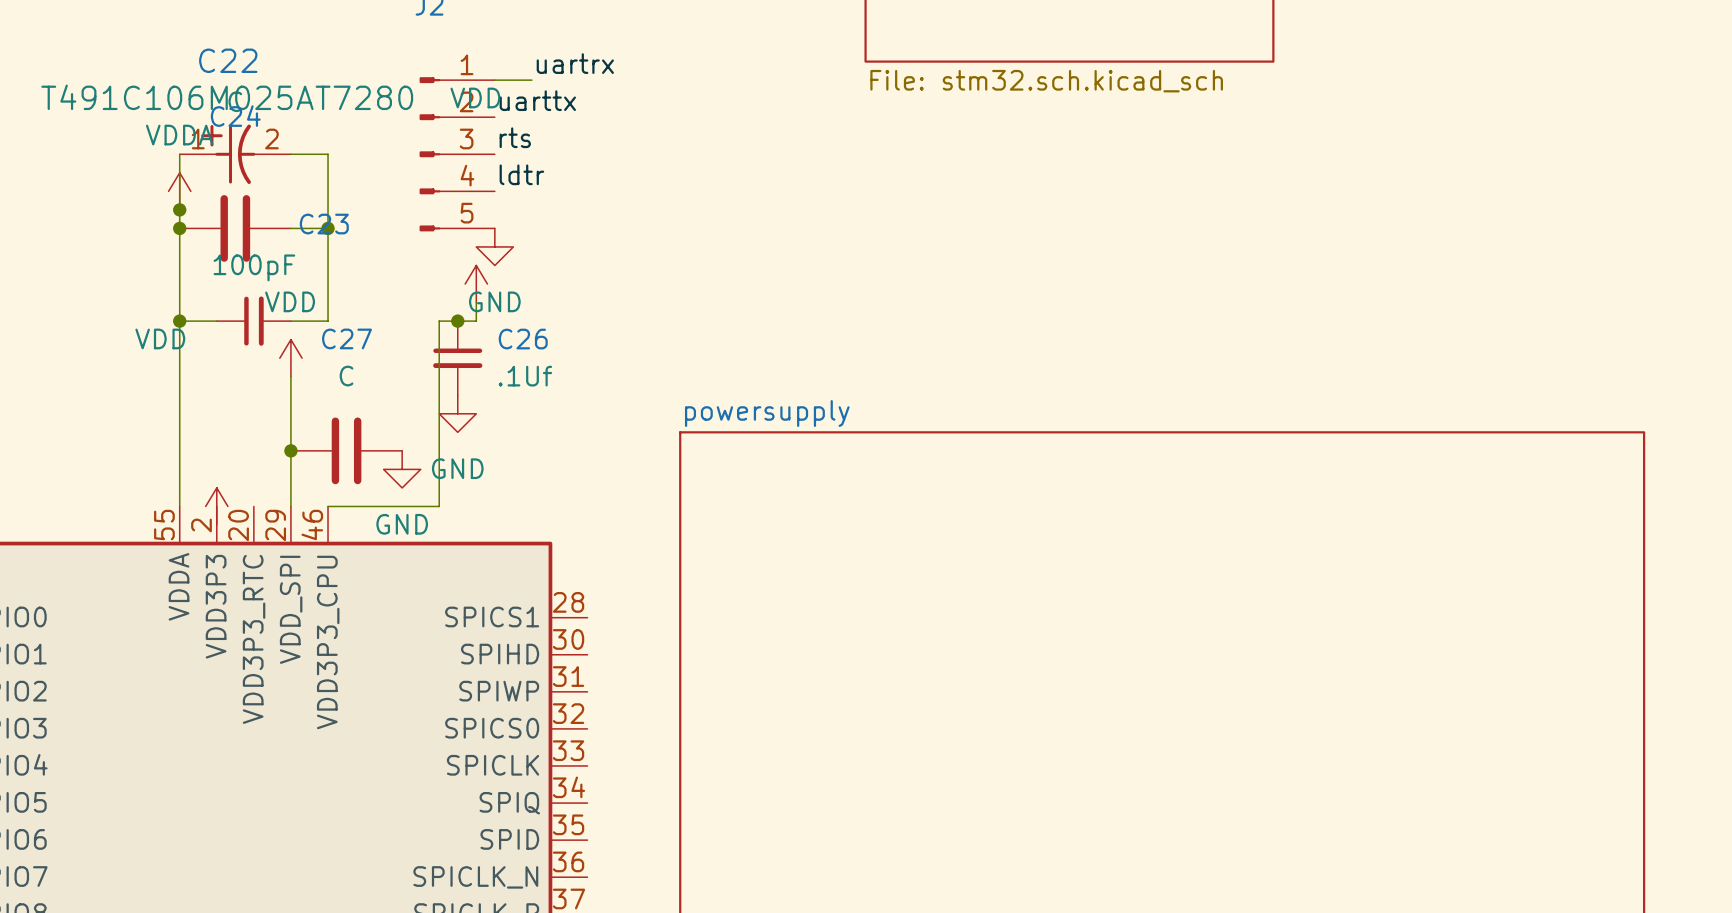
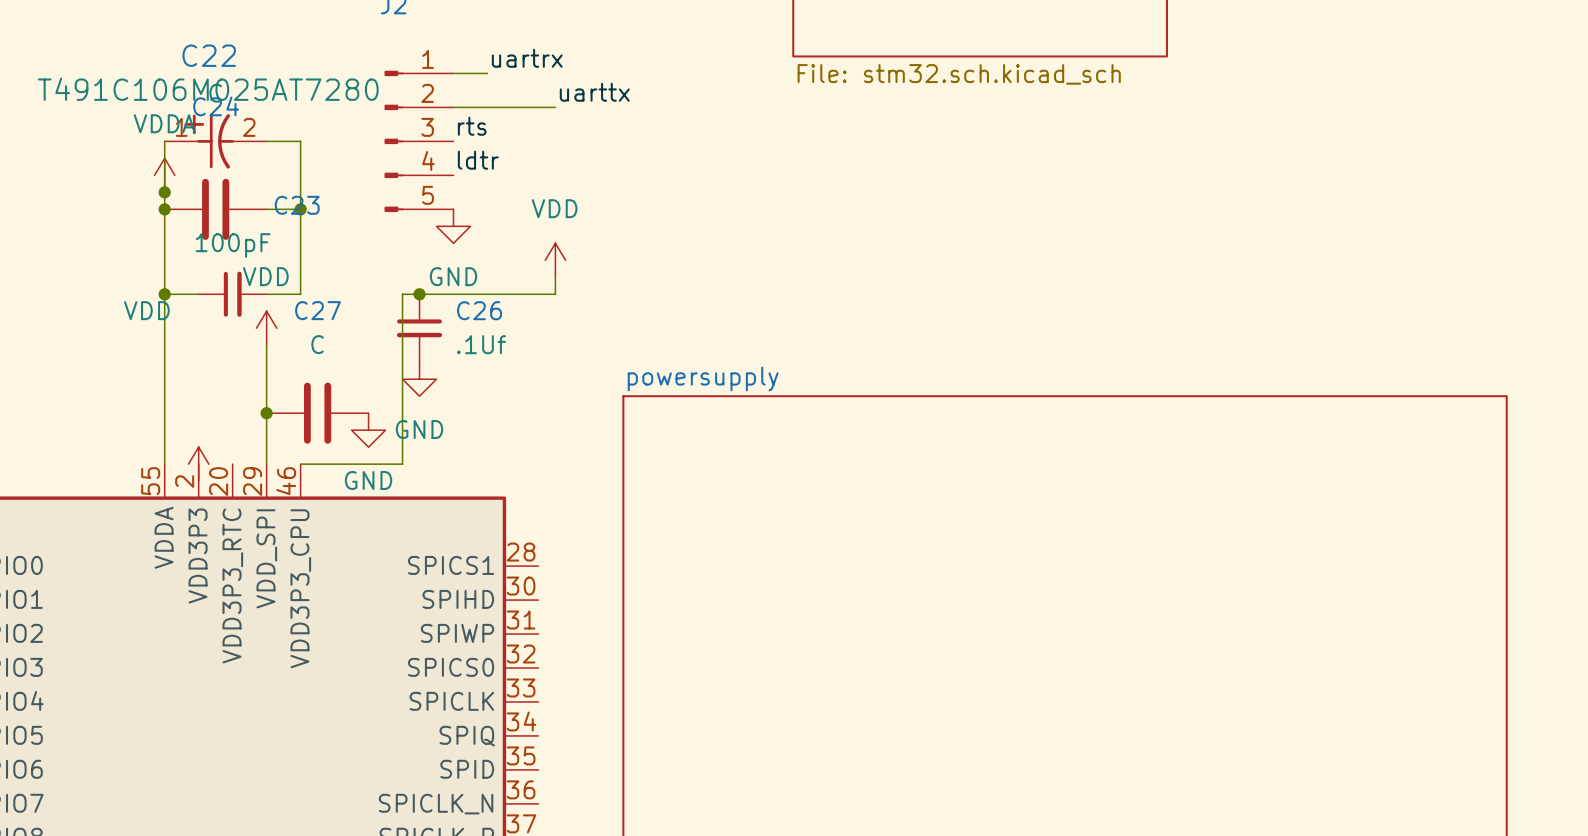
power symbol text position: VDD (475, 97) -> VDD (554, 208)
label position: uarttx (537, 100) -> uarttx (594, 92)
wire: none -> (453, 107) (555, 107)
power symbol position: VDD (476, 284) -> VDD (555, 260)
wire: (476, 302) (476, 321) -> (555, 277) (555, 294) (436, 294)

